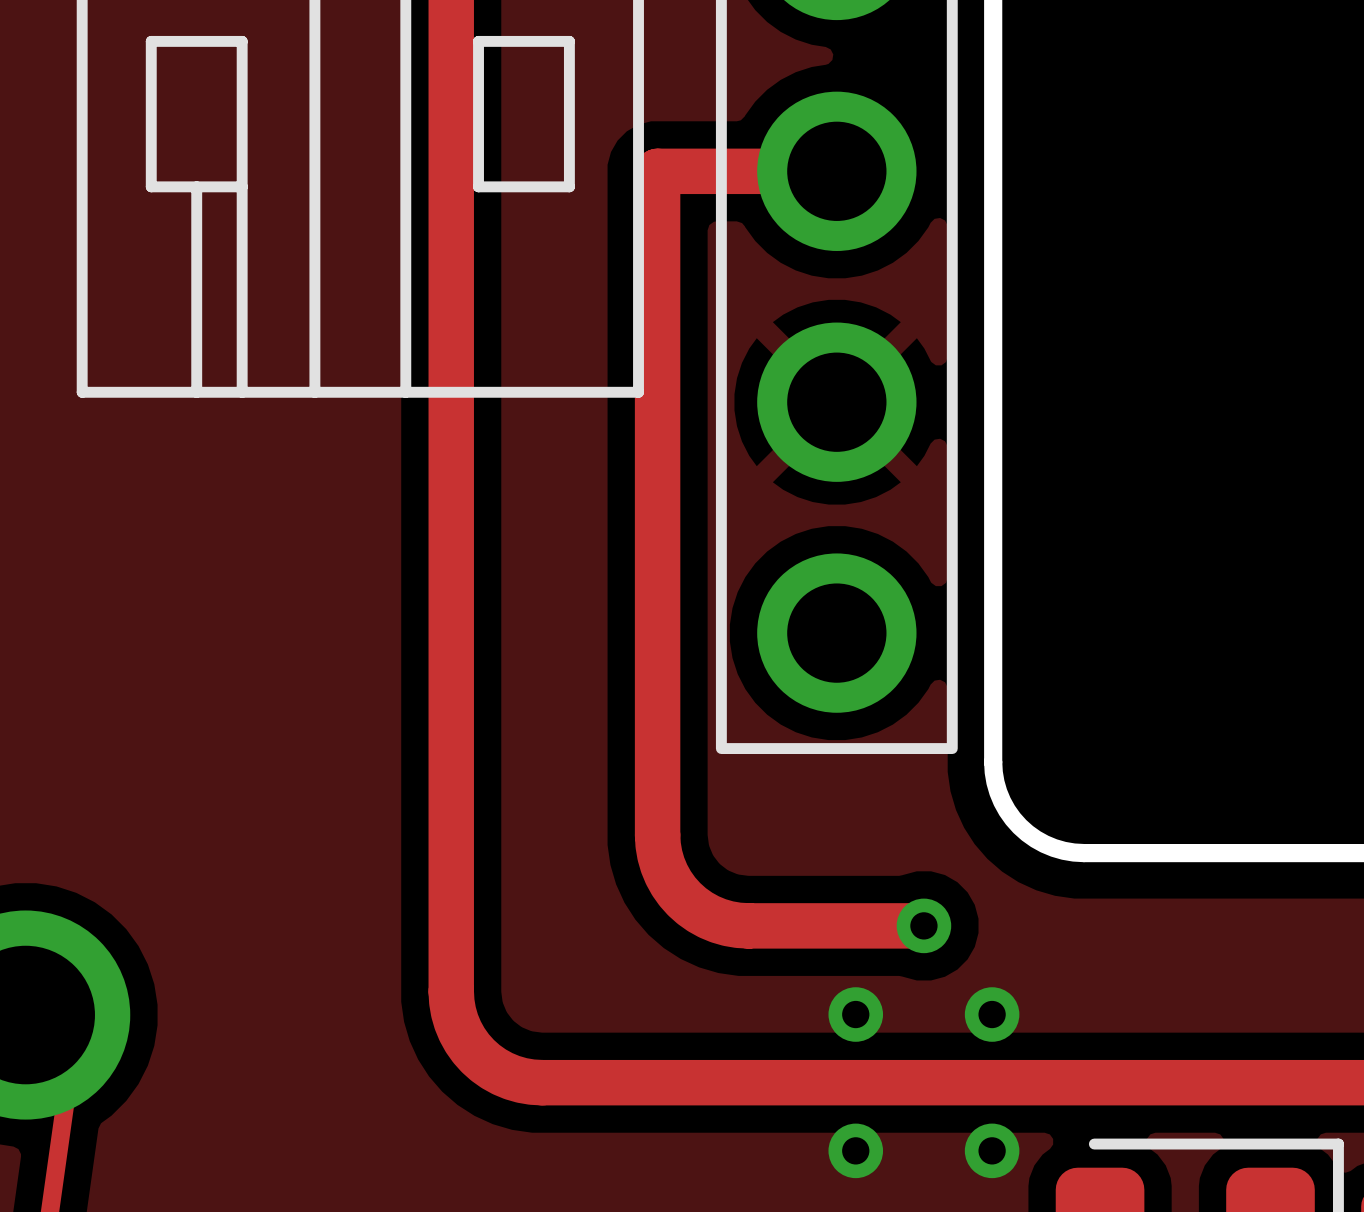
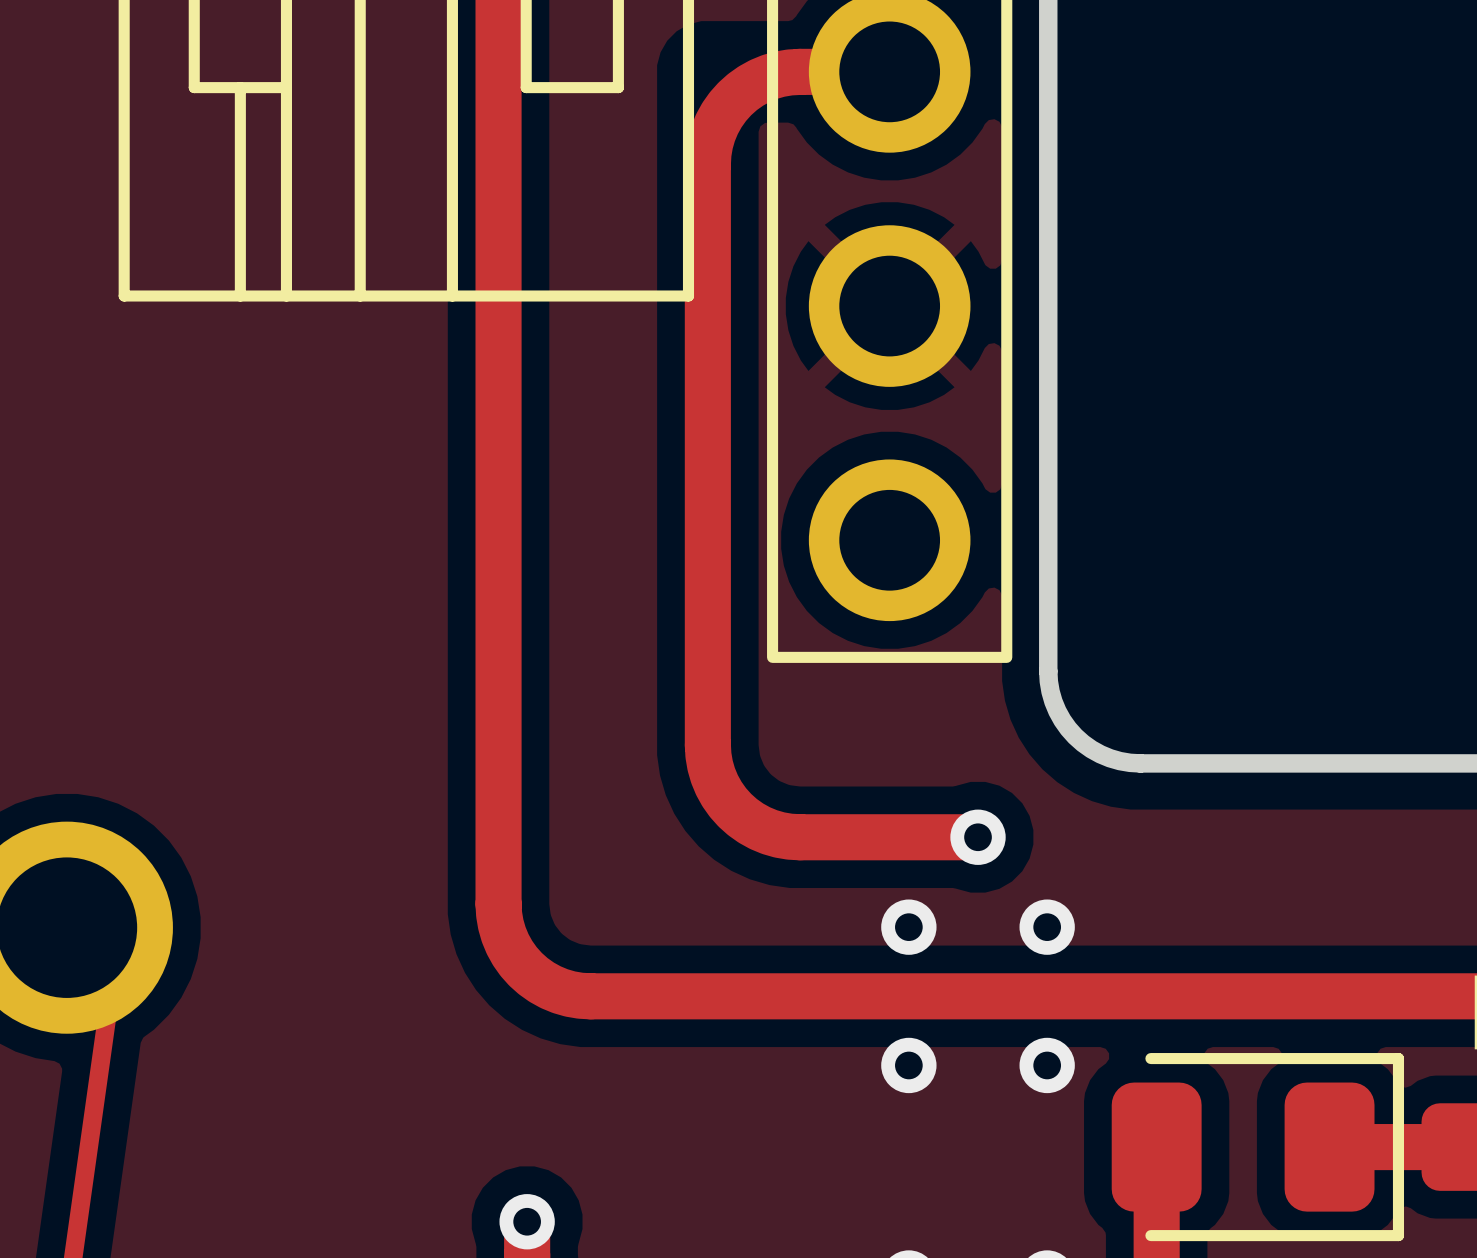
track: (748, 171) (657, 171) (657, 262) -> (800, 71) (779, 74) (760, 81) (734, 98) (716, 124) (710, 143) (707, 164)

